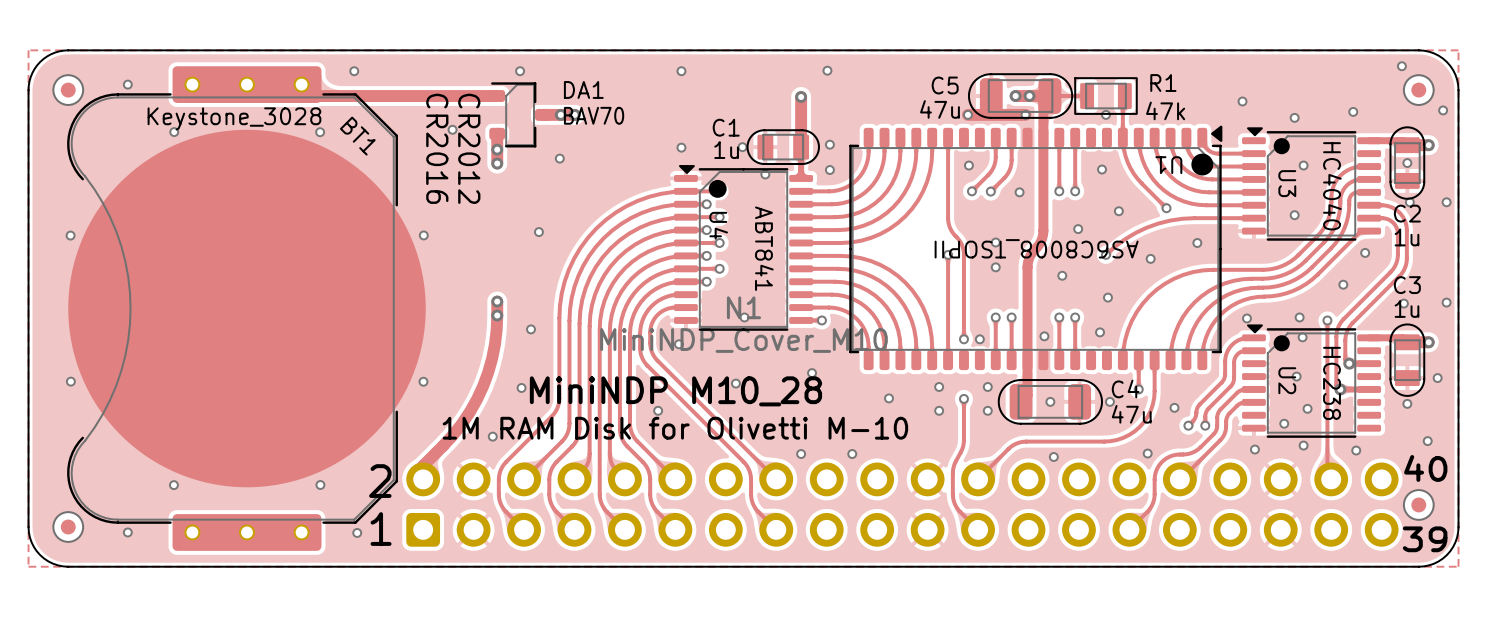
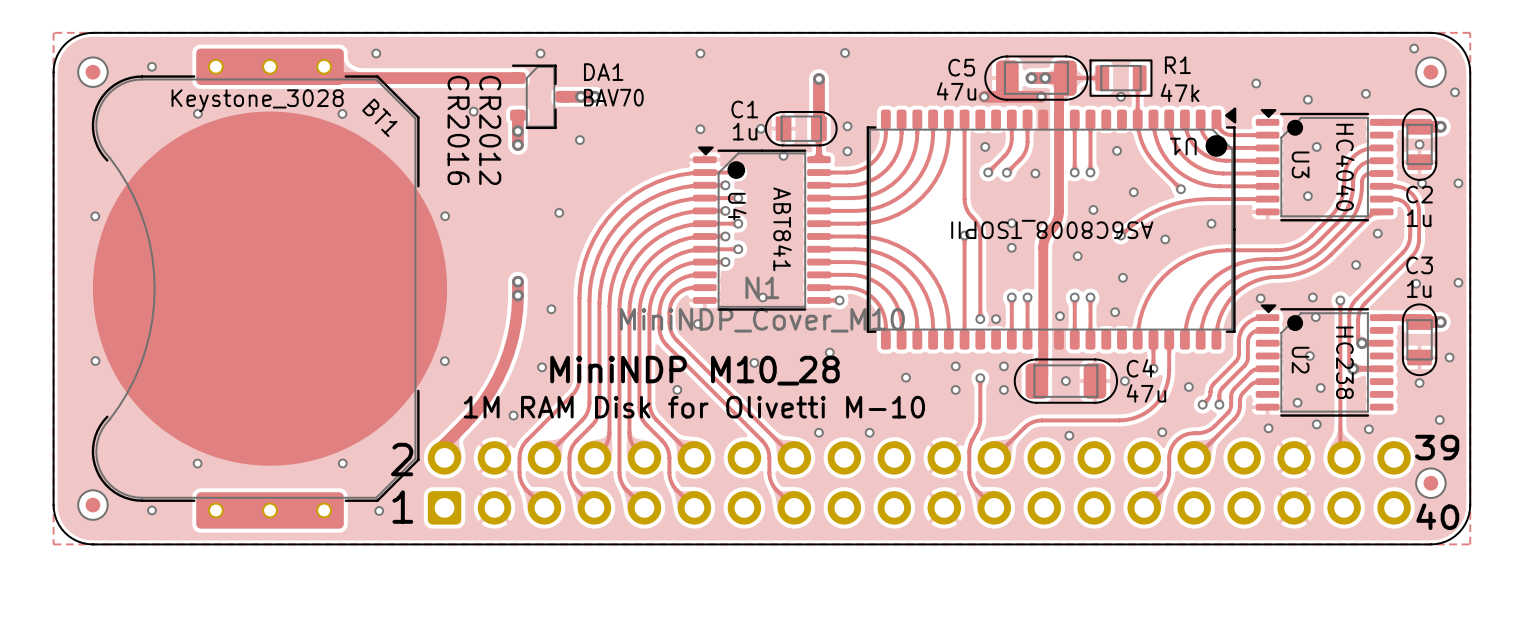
text: 40 (1425, 468) -> 39 (1437, 447)
text: 39 (1425, 539) -> 40 (1437, 516)

